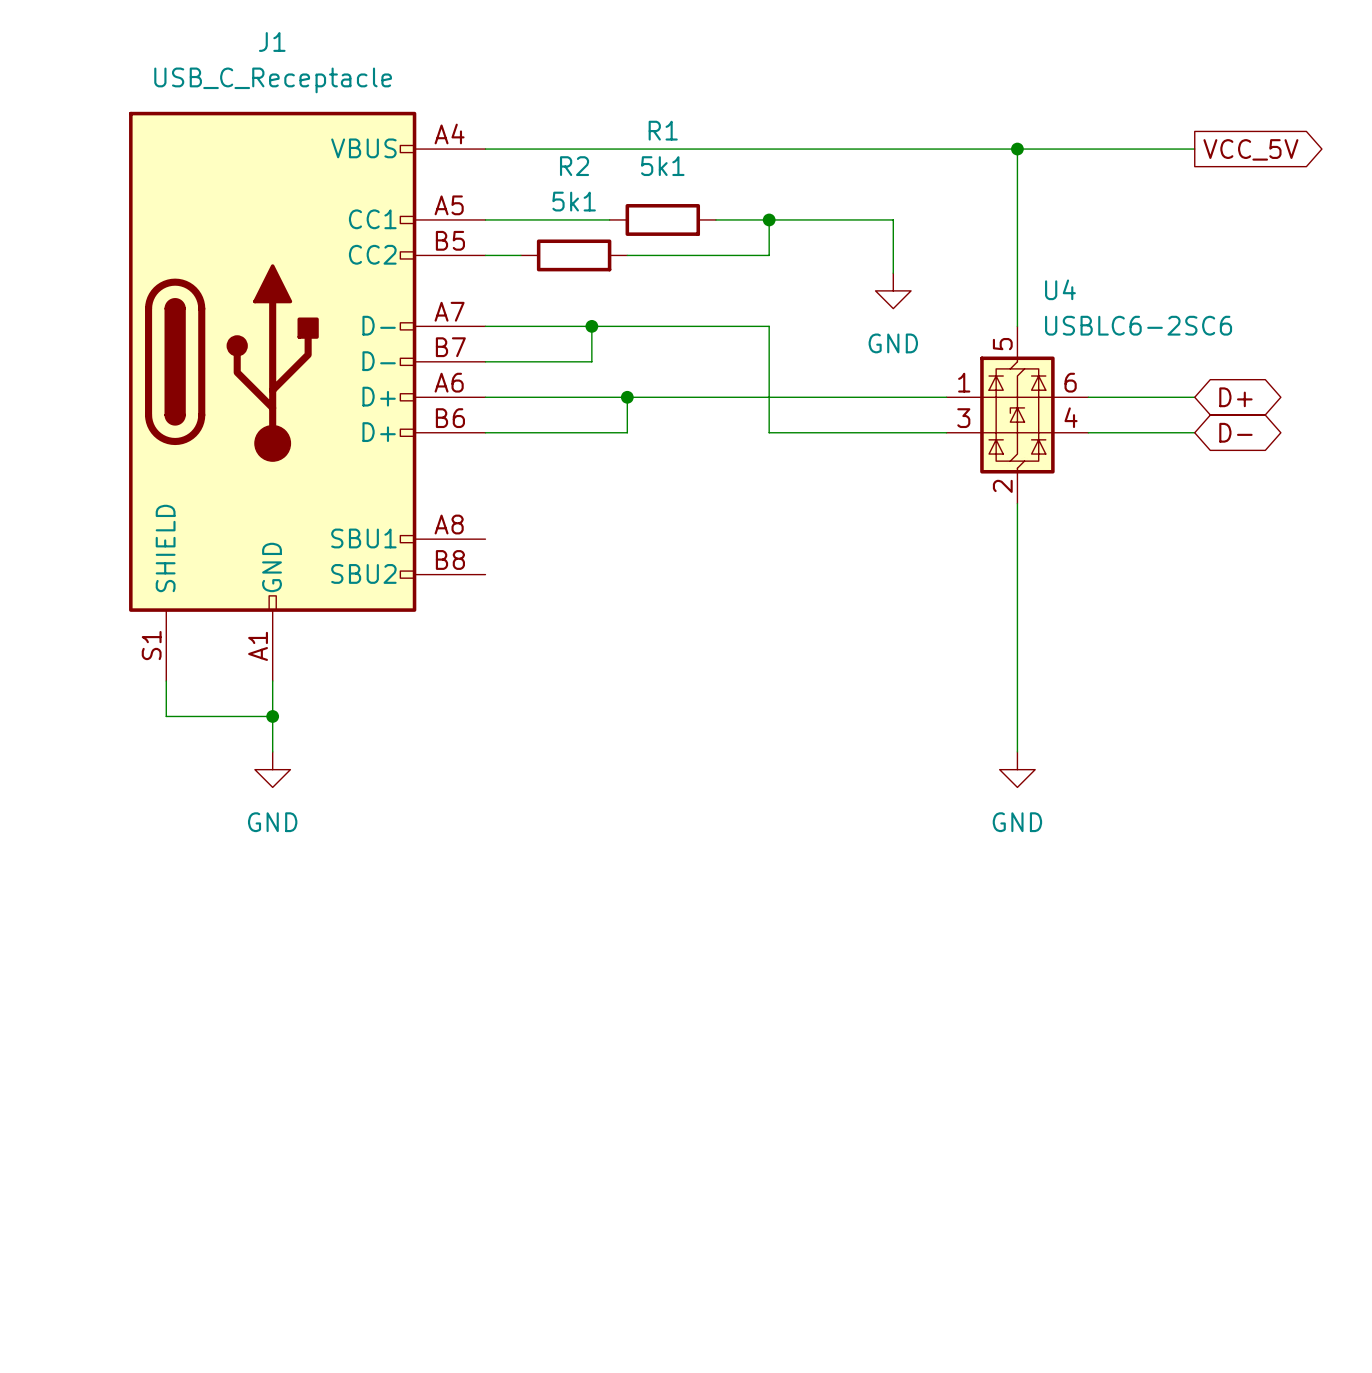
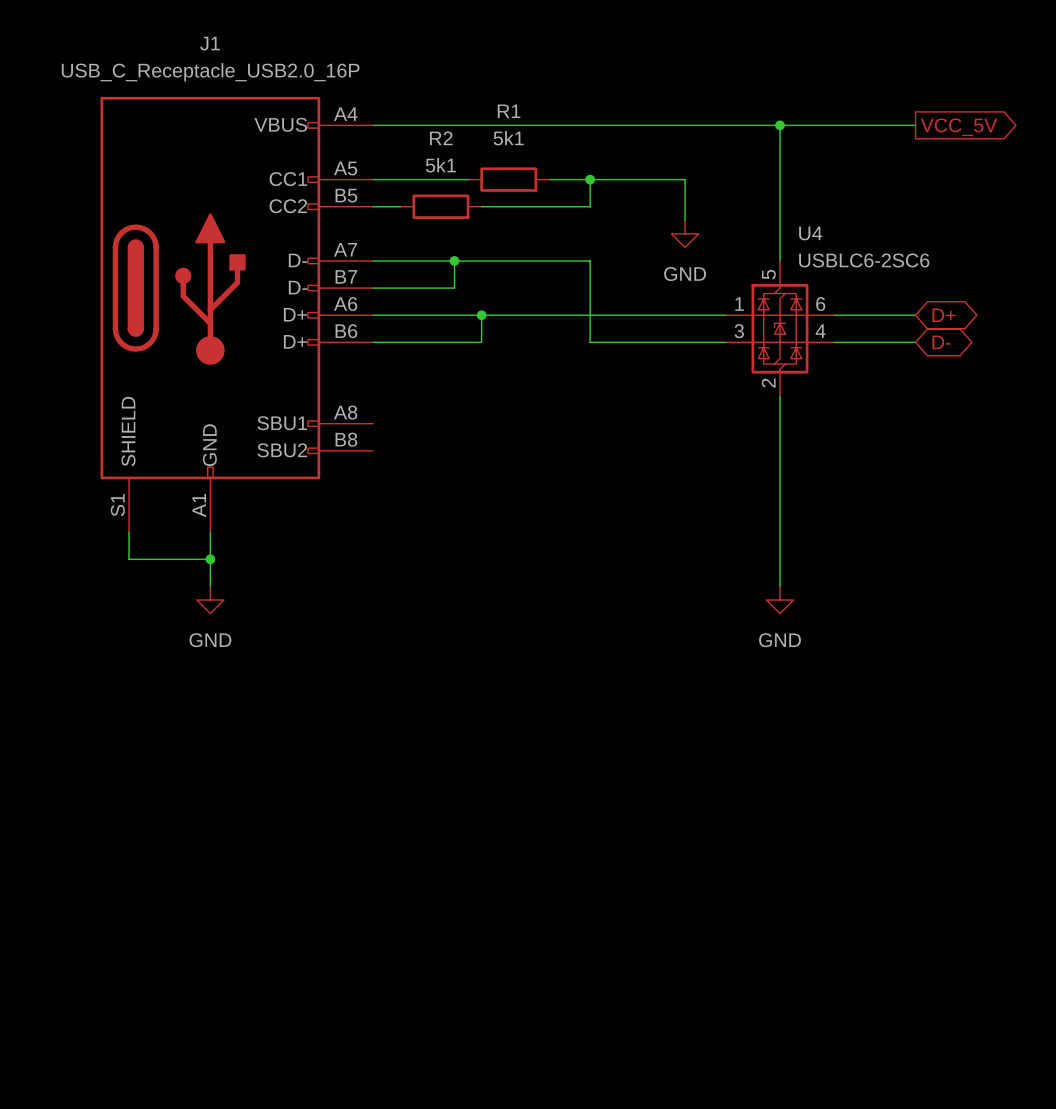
J1 value: USB_C_Receptacle (273, 80) -> USB_C_Receptacle_USB2.0_16P (210, 72)

